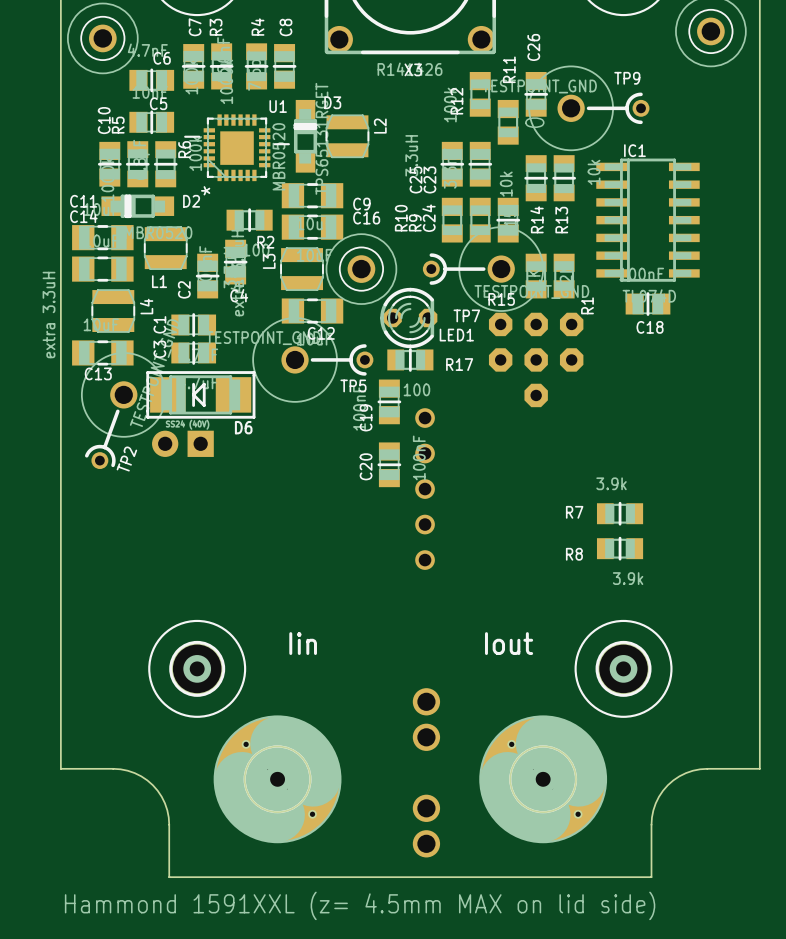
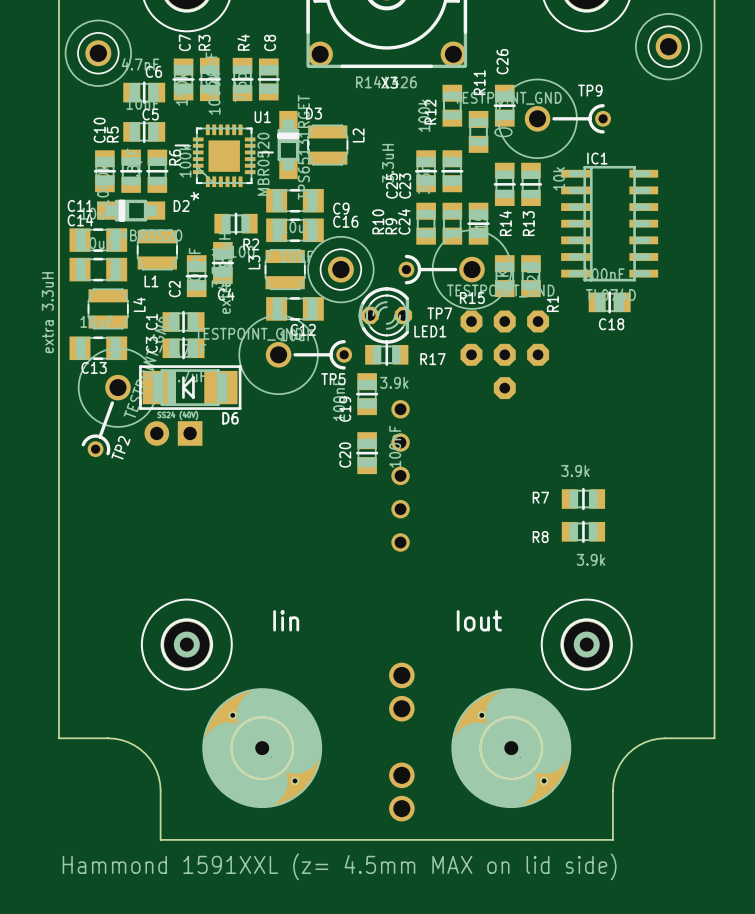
R14 value: 10k (506, 184) -> none
R17 value: 100 (416, 389) -> 3.9k (394, 382)

